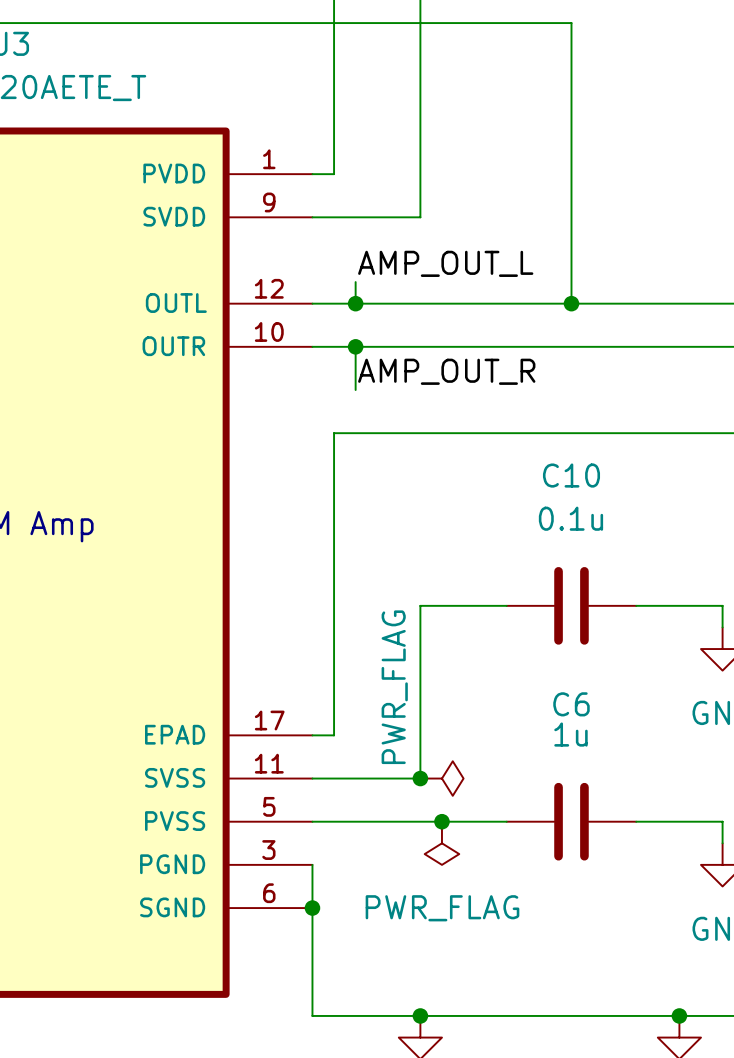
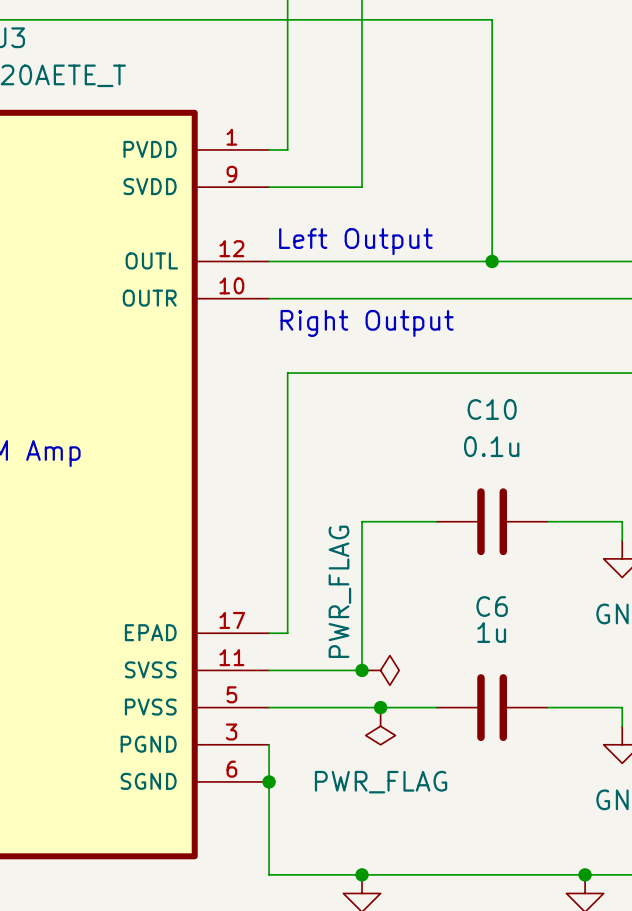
label: AMP_OUT_L (445, 263) -> none
text: none -> Left Output (355, 241)
wire: (355, 282) (355, 303) -> none
junction: (355, 303) -> none
wire: (355, 346) (355, 390) -> none
junction: (355, 346) -> none
label: AMP_OUT_R (446, 371) -> none
text: none -> Right Output (367, 323)

